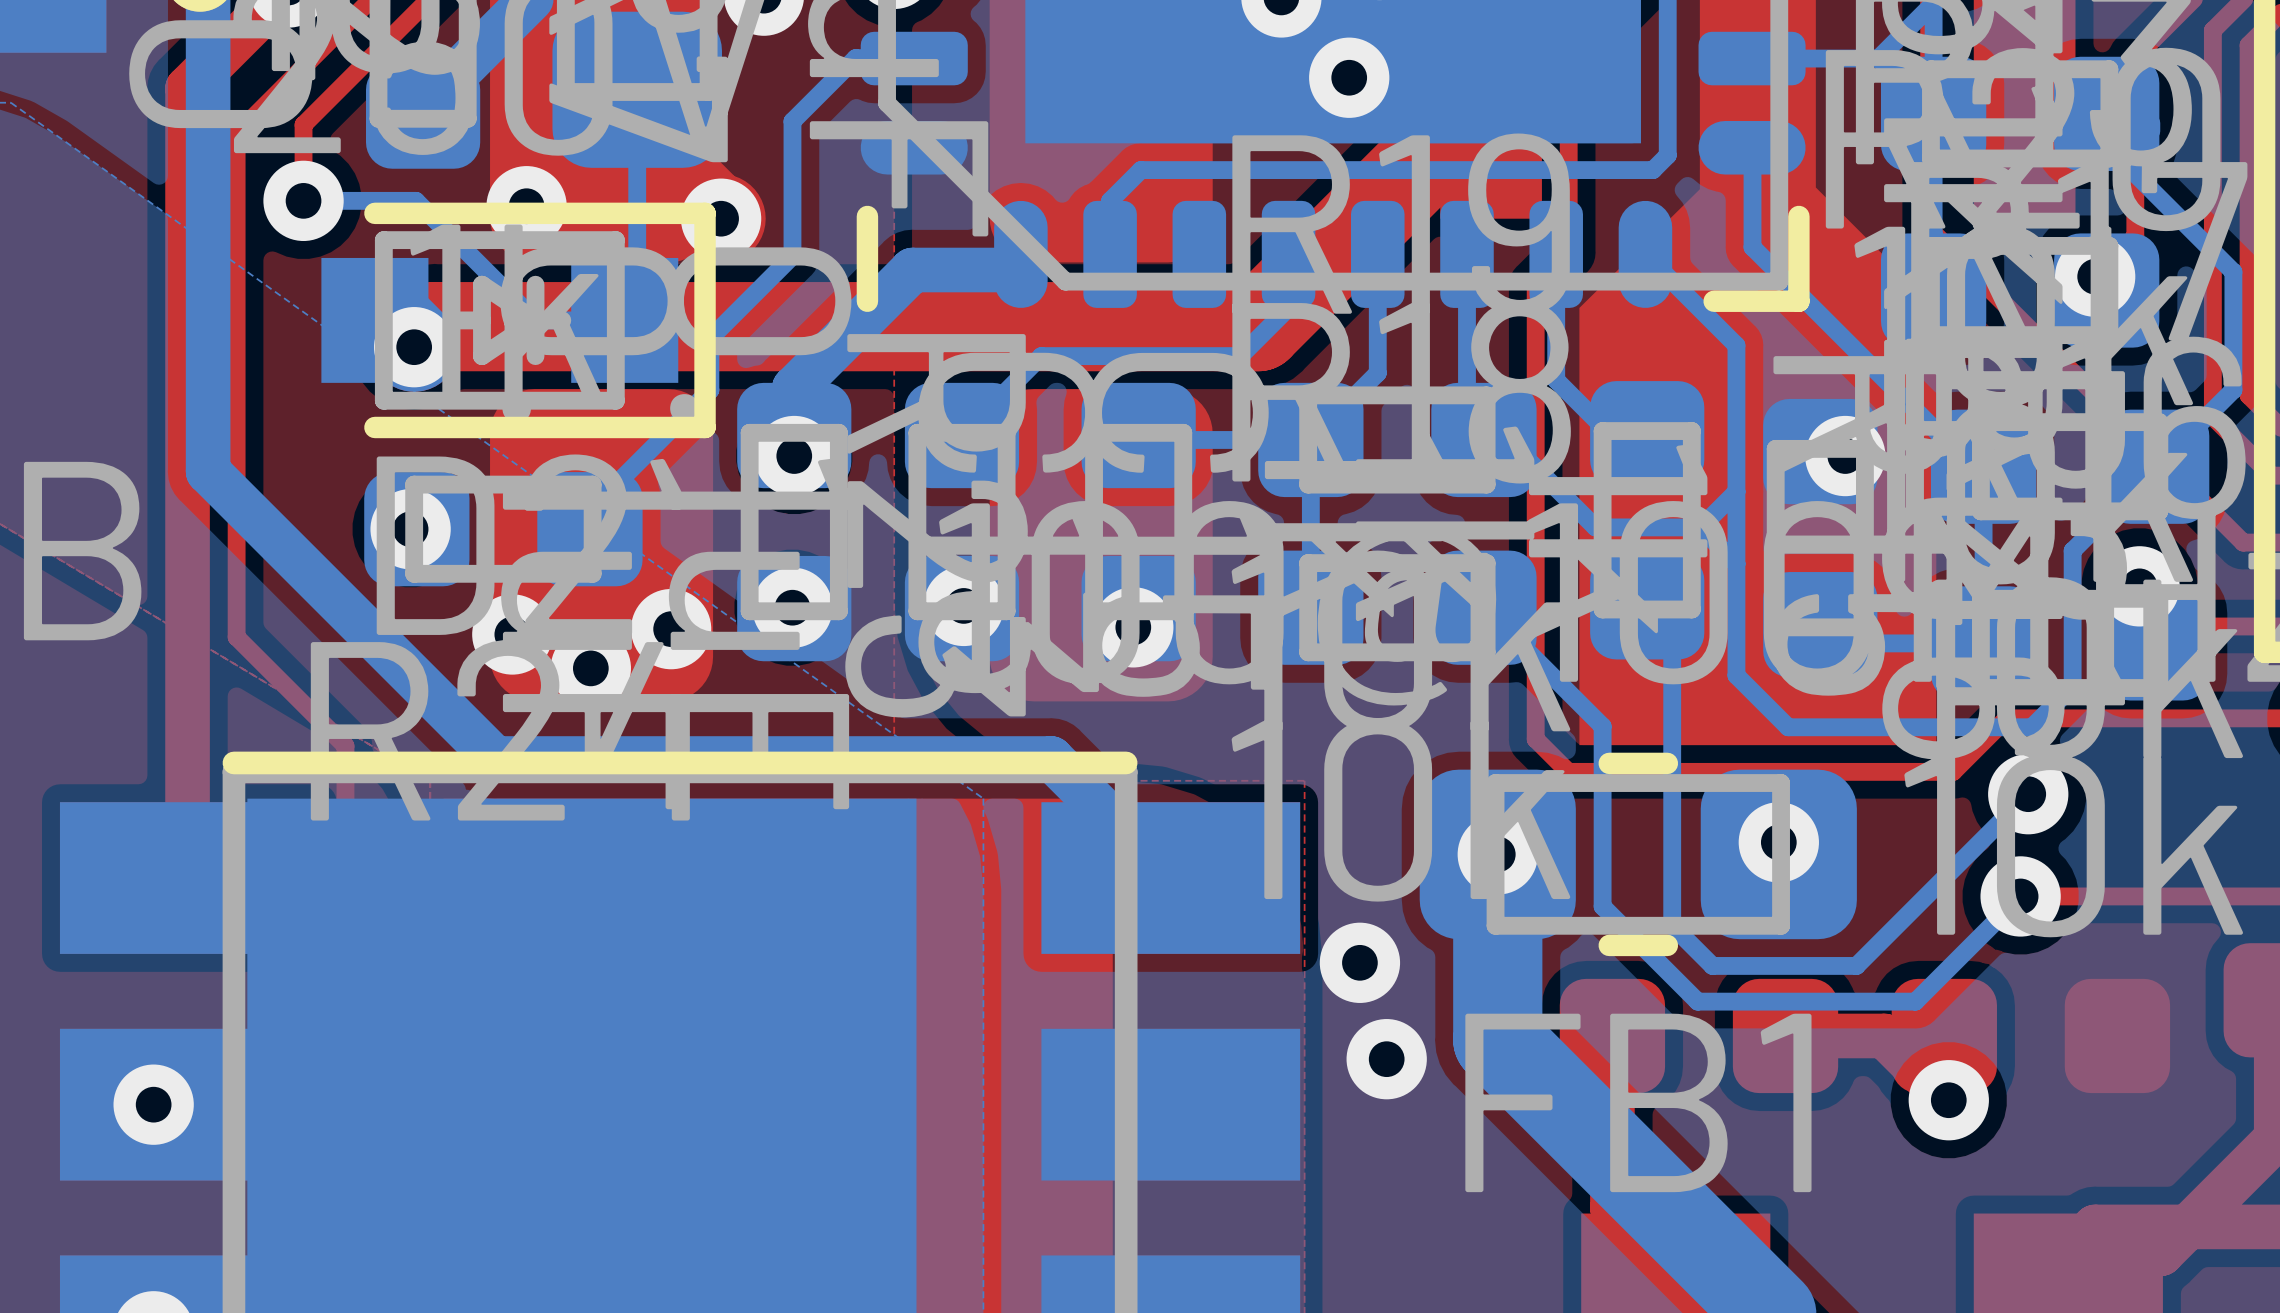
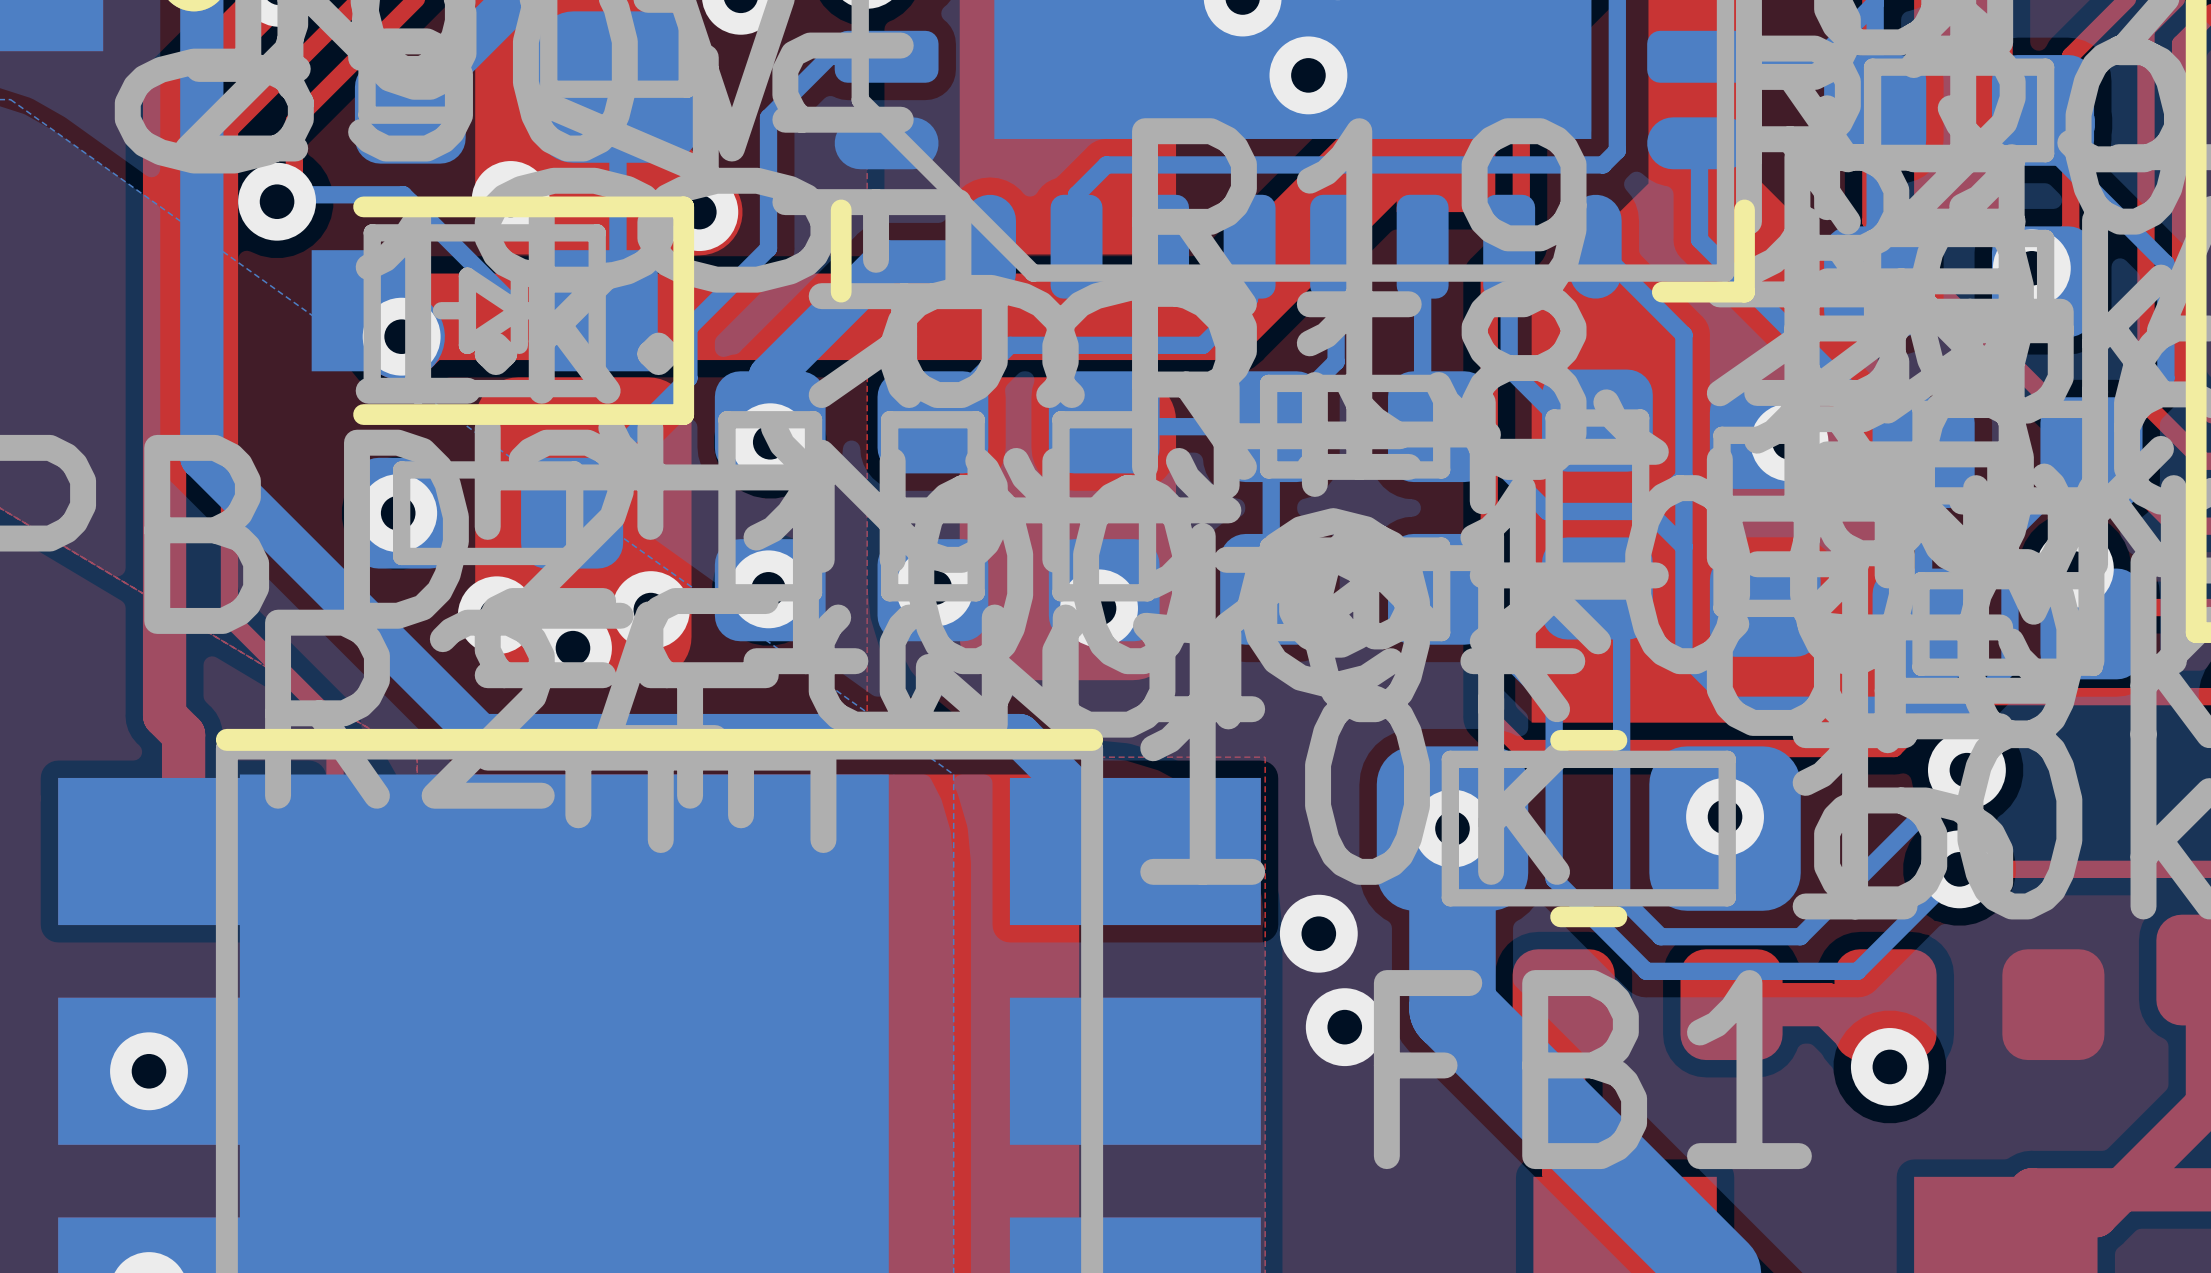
top track: (187, 88) (187, 876) -> (181, 85) (164, 103) (164, 715) (183, 734) (183, 851)
via position: (303, 200) -> (277, 201)

